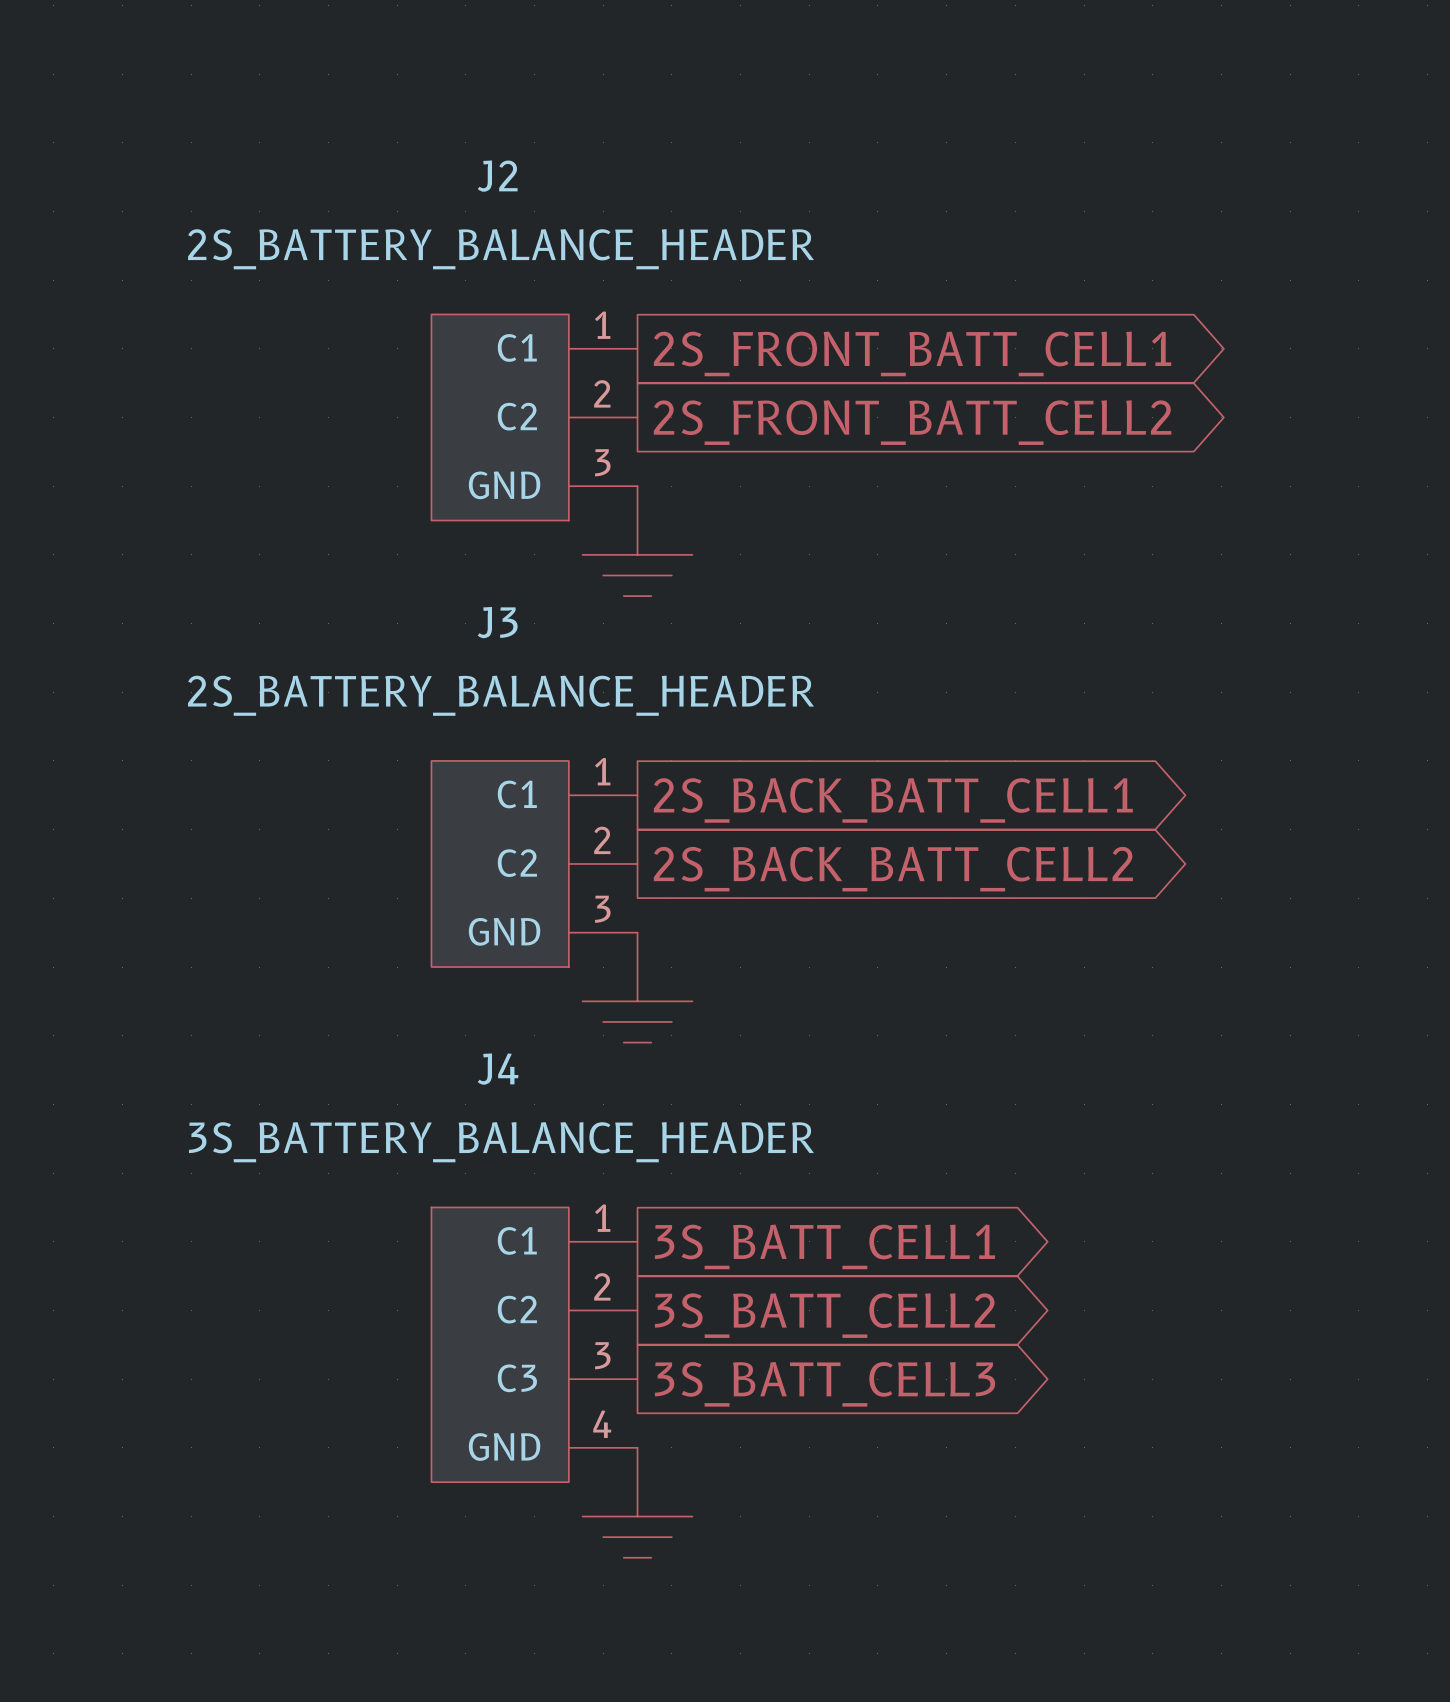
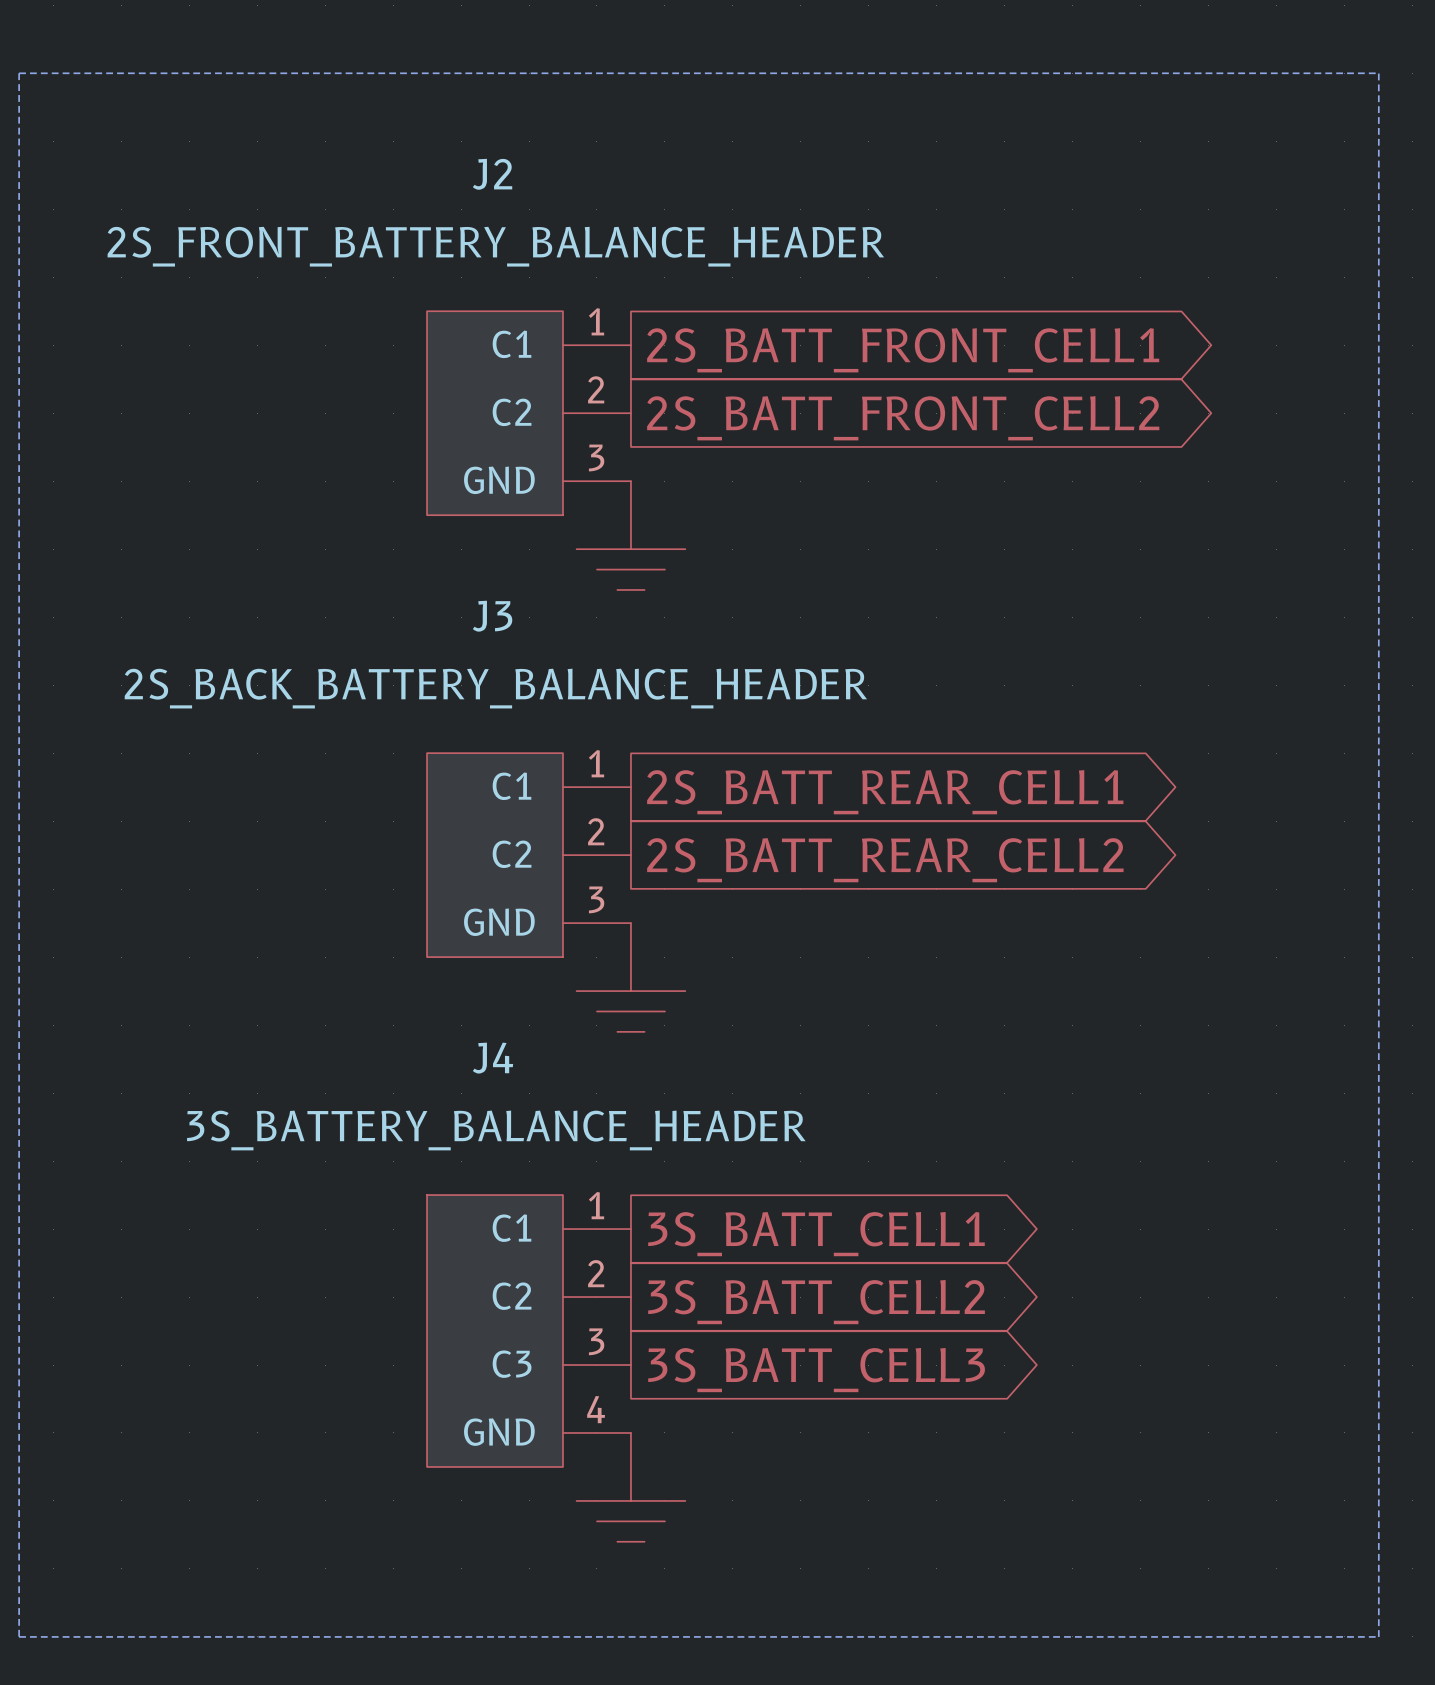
line: none -> (19, 73) (1378, 73) (1378, 1636) (19, 1636) (19, 73)
J2 value: 2S_BATTERY_BALANCE_HEADER (501, 249) -> 2S_FRONT_BATTERY_BALANCE_HEADER (495, 246)
global label: 2S_FRONT_BATT_CELL1 (912, 353) -> 2S_BATT_FRONT_CELL1 (903, 350)
global label: 2S_FRONT_BATT_CELL2 (912, 422) -> 2S_BATT_FRONT_CELL2 (903, 418)
J3 value: 2S_BATTERY_BALANCE_HEADER (501, 695) -> 2S_BACK_BATTERY_BALANCE_HEADER (495, 688)
global label: 2S_BACK_BATT_CELL1 (893, 800) -> 2S_BATT_REAR_CELL1 (885, 792)
global label: 2S_BACK_BATT_CELL2 (893, 869) -> 2S_BATT_REAR_CELL2 (885, 860)

